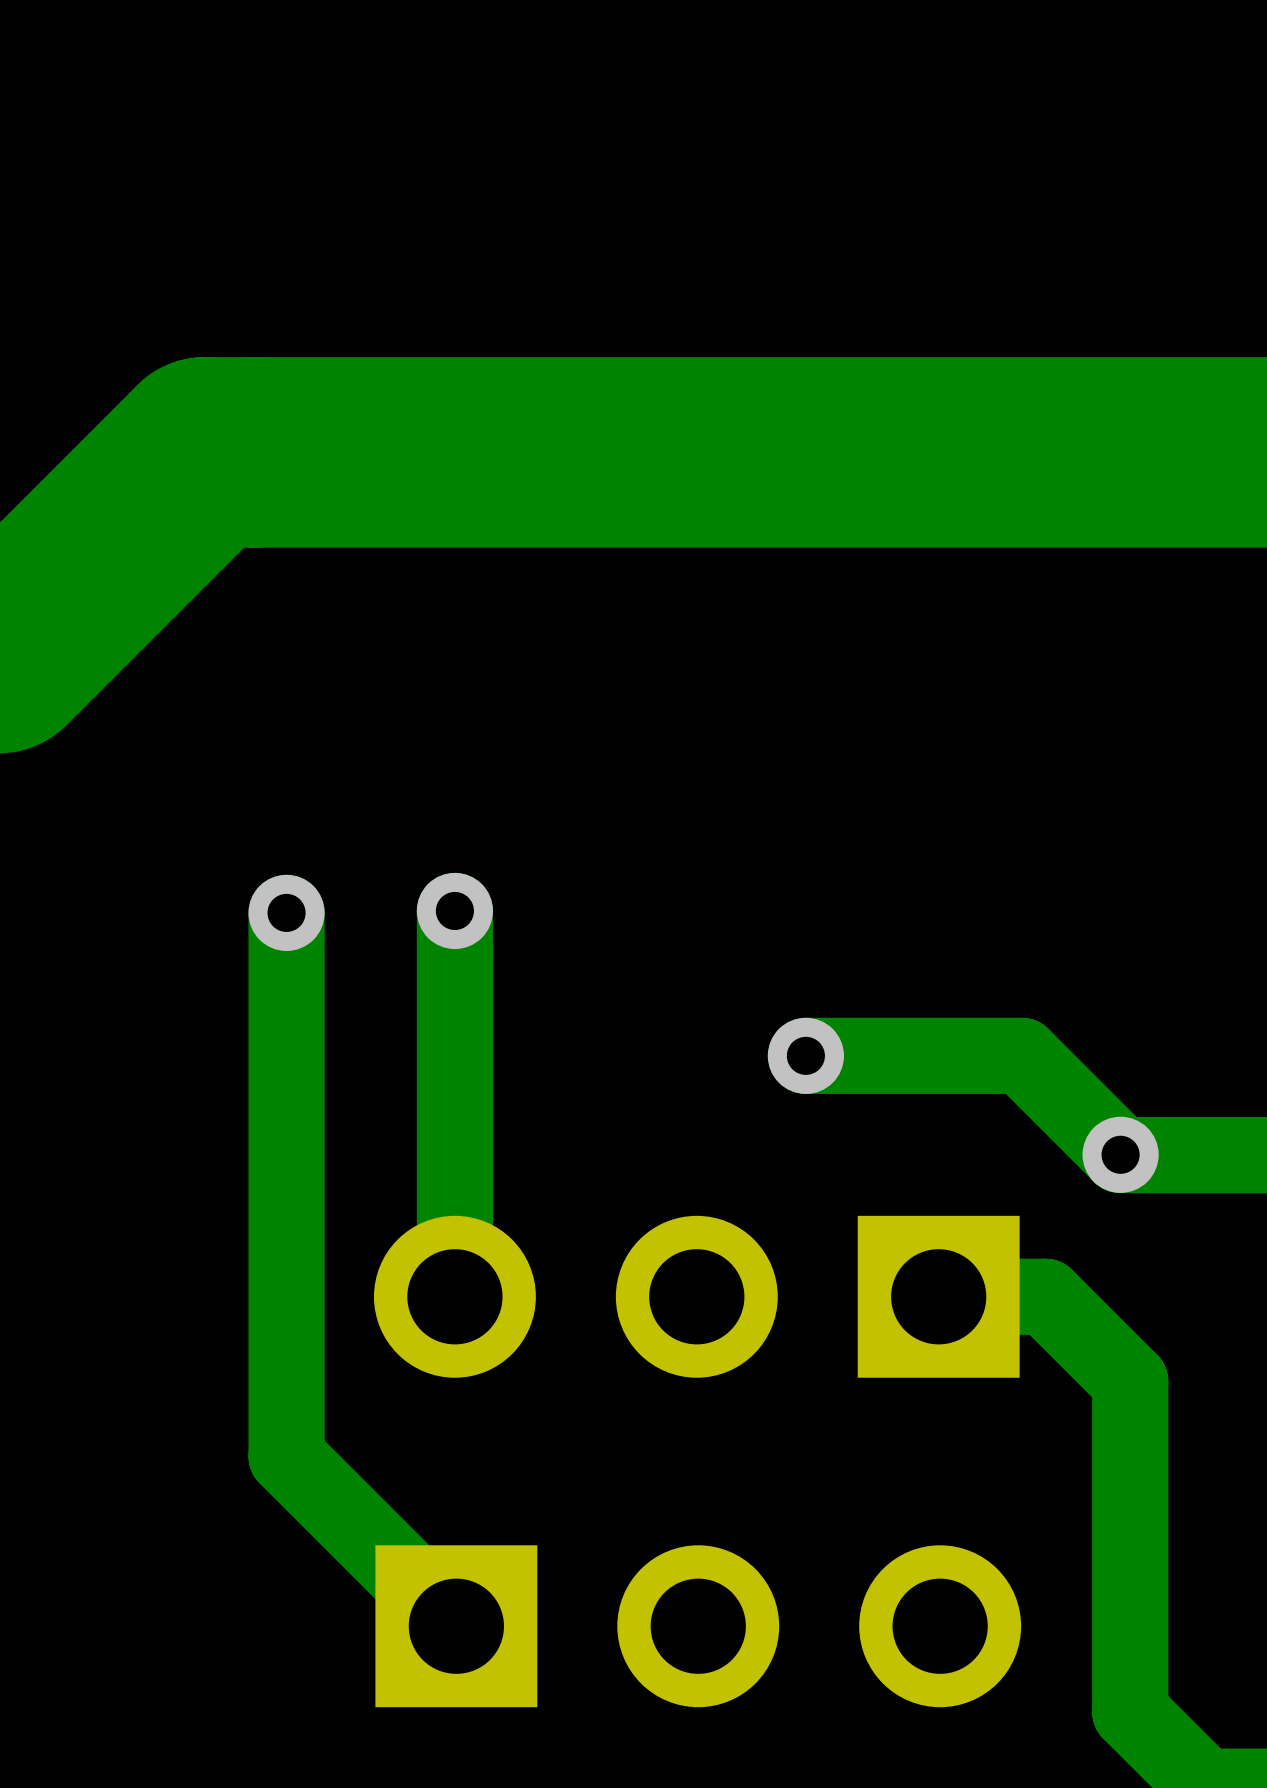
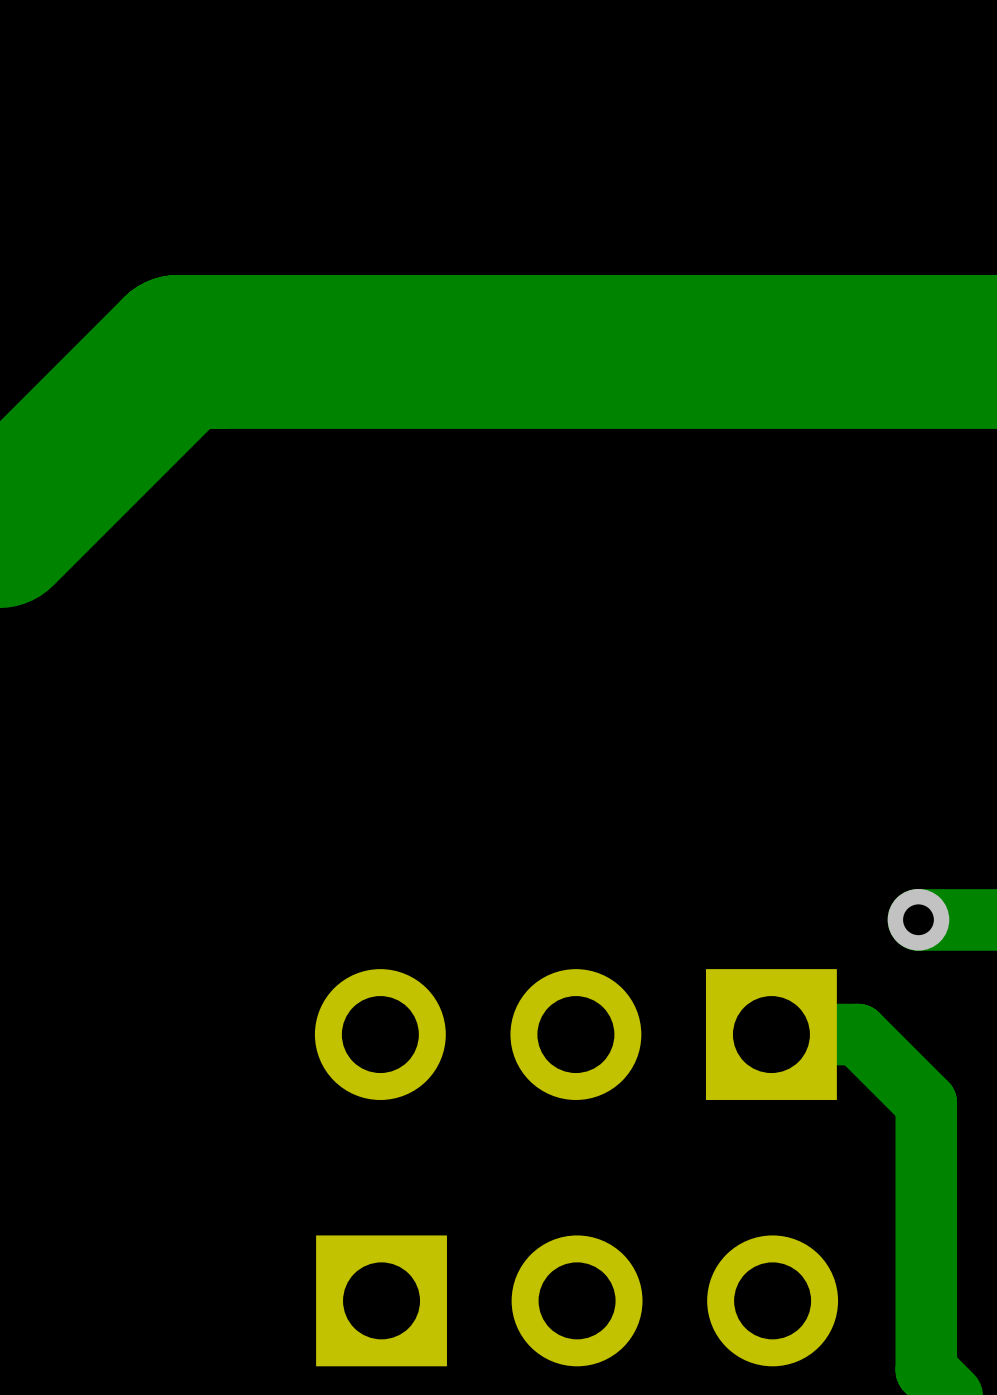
track: (454, 910) (454, 1296) -> none
via: (454, 910) -> none
track: (286, 912) (286, 1456) (456, 1626) -> none
via: (286, 912) -> none
track: (805, 1055) (1021, 1055) (1120, 1154) -> none
via: (805, 1055) -> none

